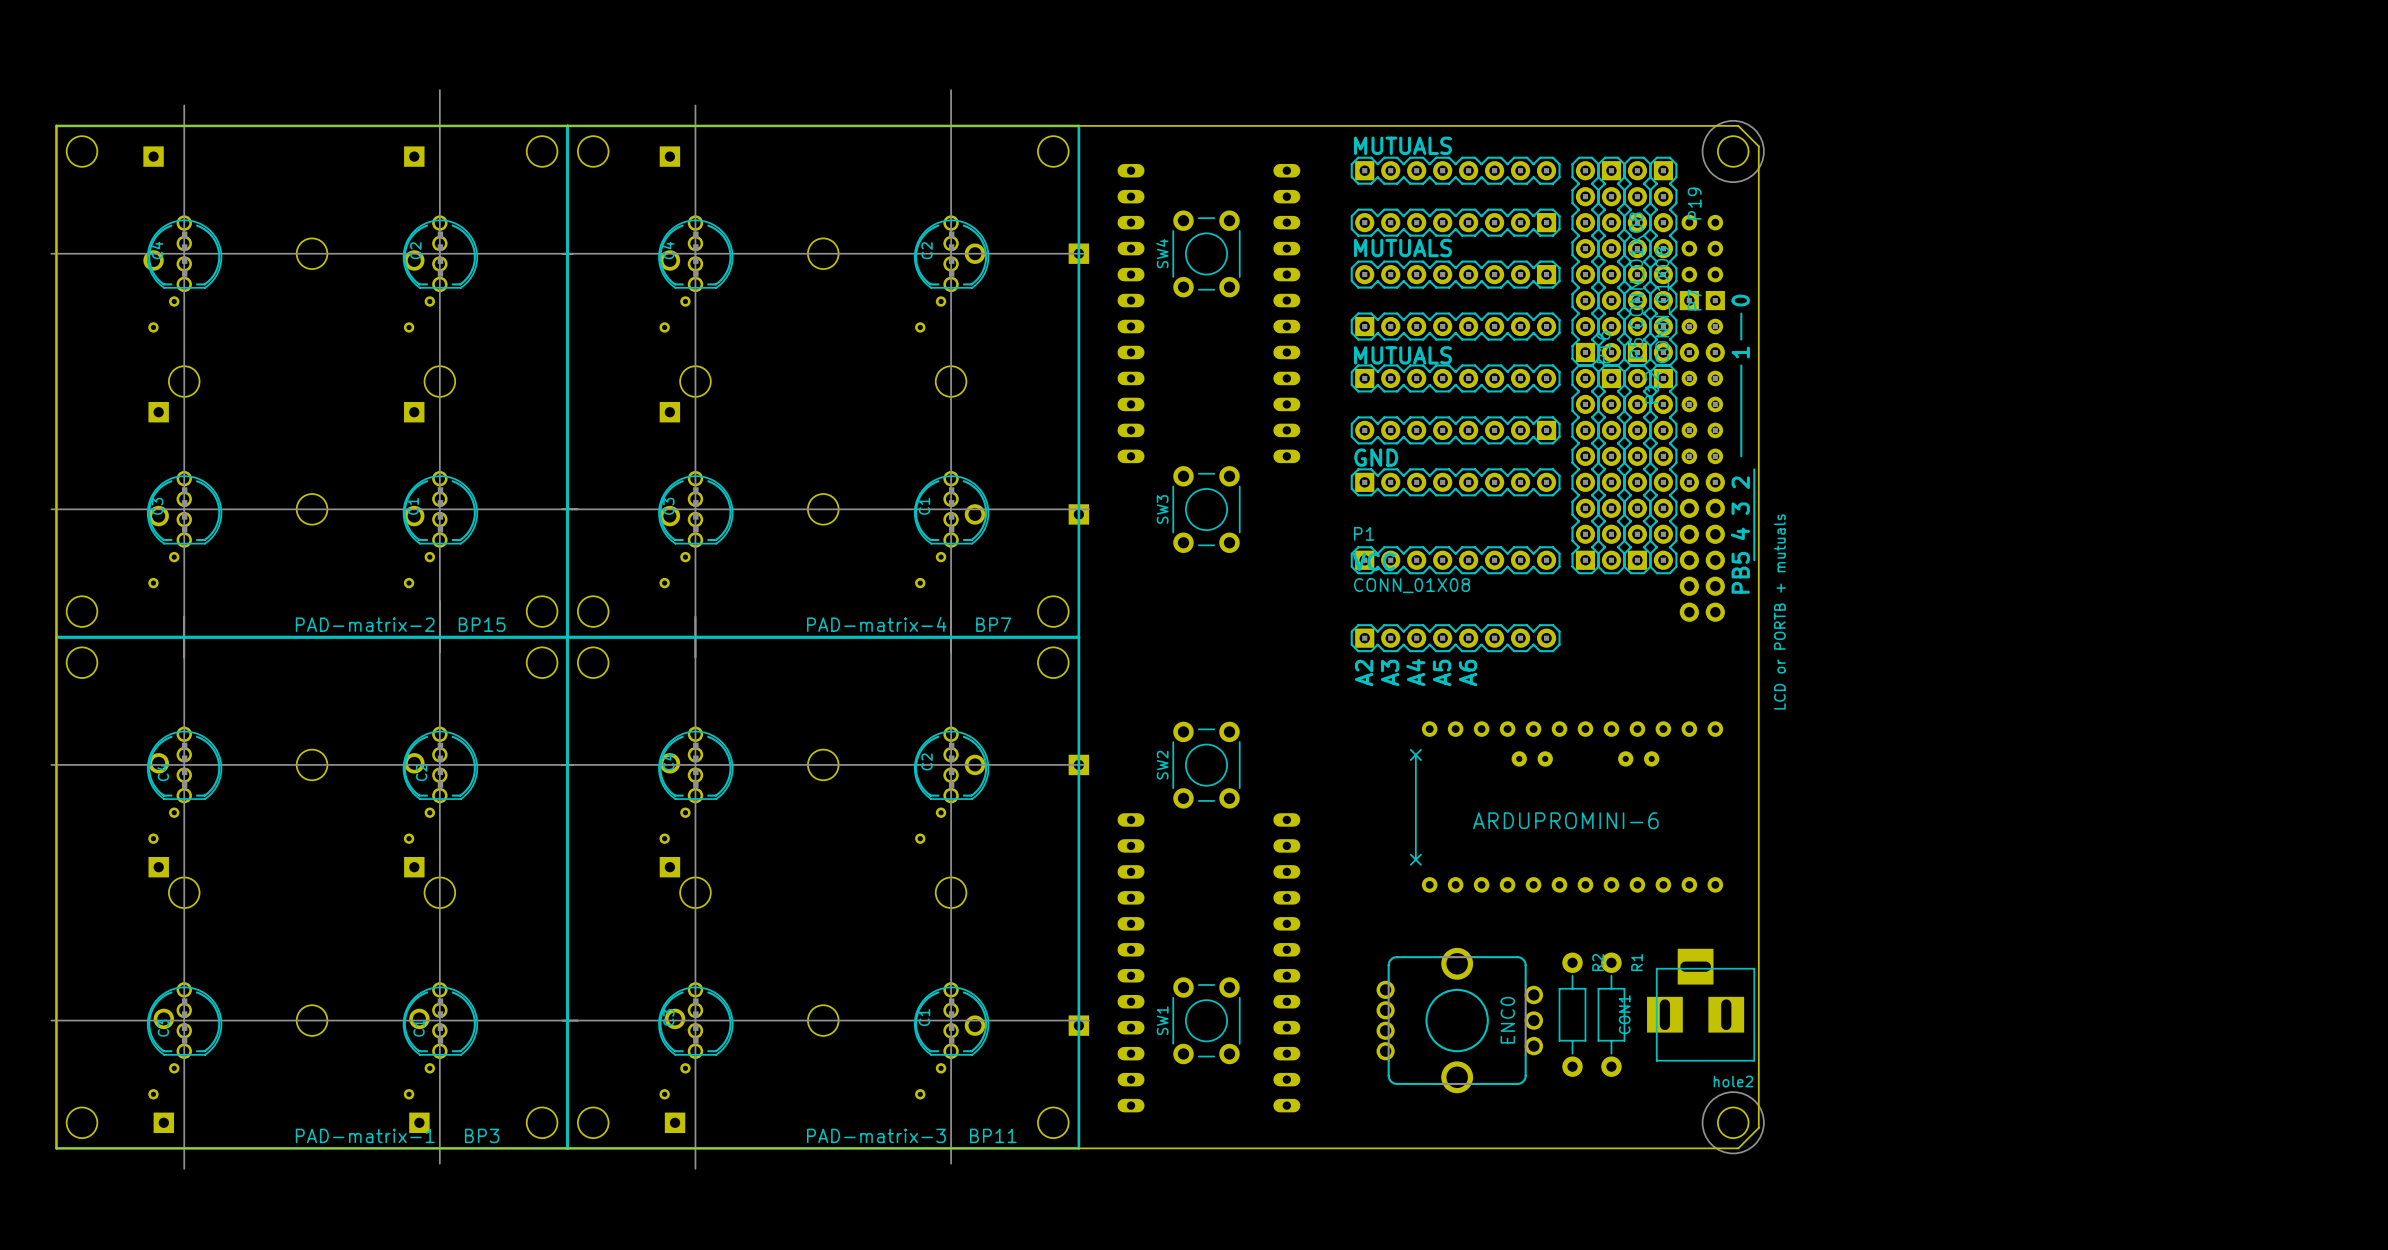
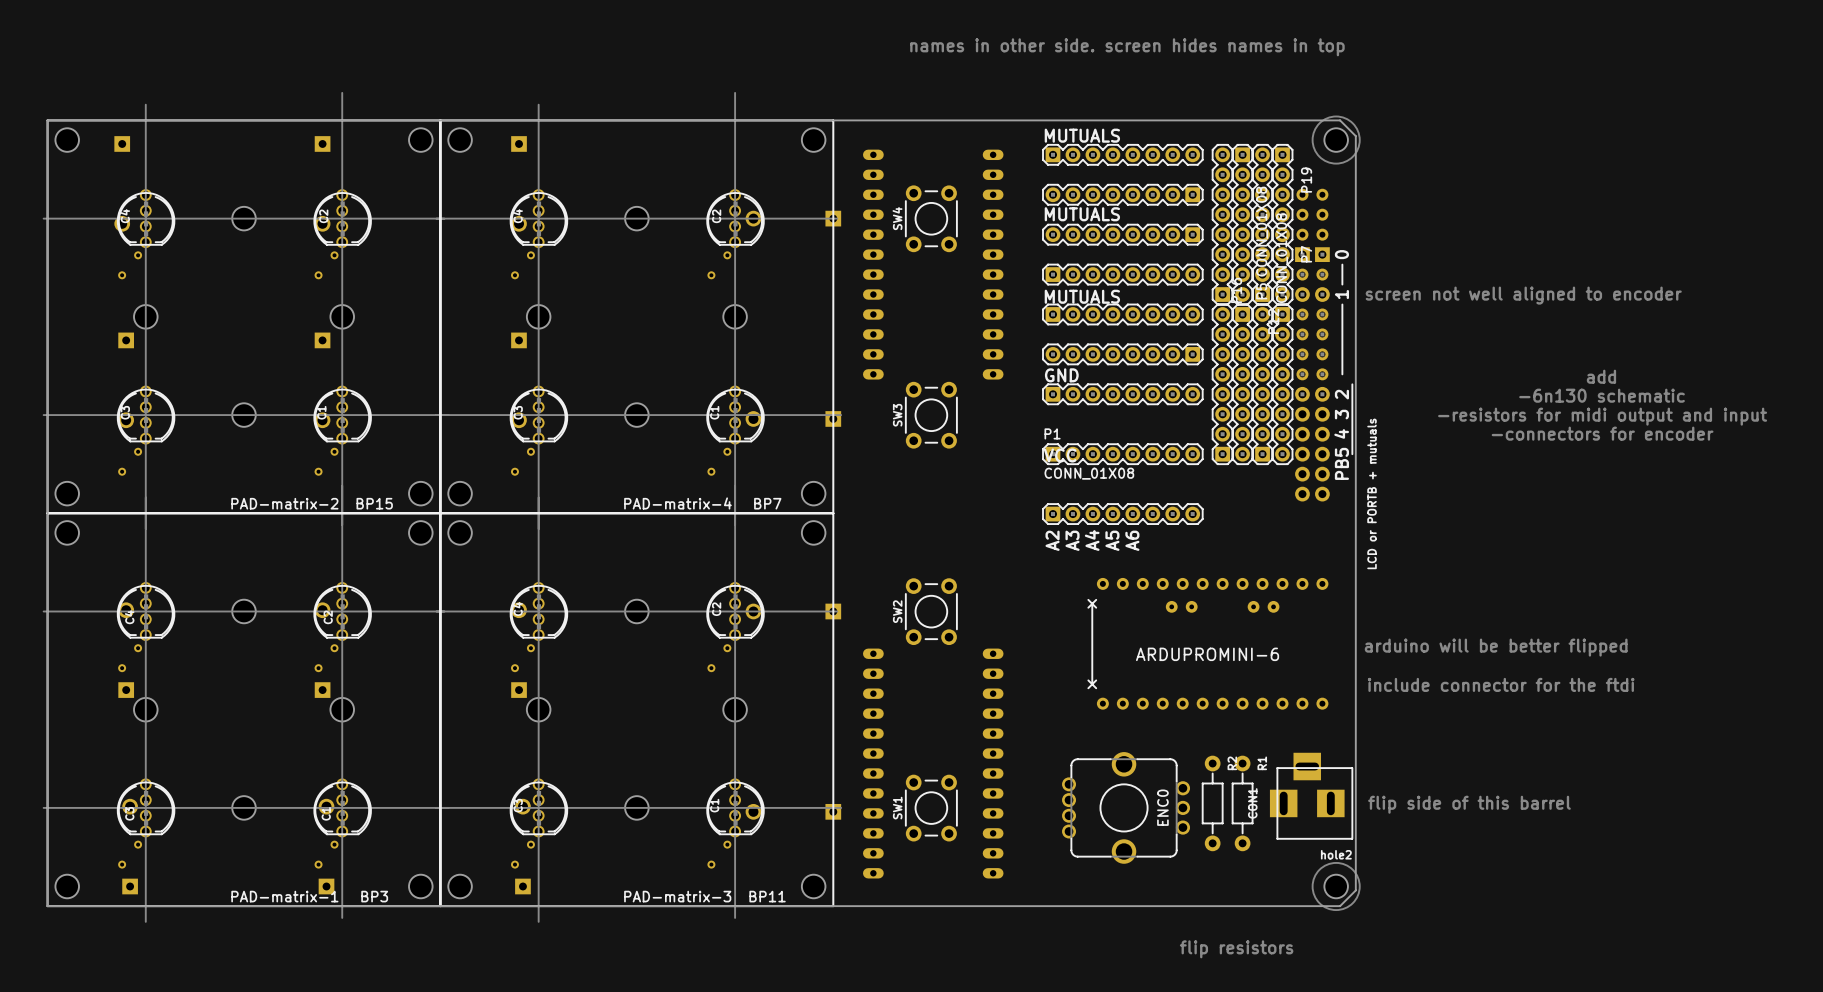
text: none -> names in other side. screen hides names in top (1127, 47)
text: none -> screen not well aligned to encoder (1523, 295)
text: none -> add (1601, 376)
text: none -> -6n130 schematic (1602, 395)
text: none -> -resistors for midi output and input (1602, 416)
text: none -> -connectors for encoder (1602, 433)
text: none -> arduino will be better flipped (1496, 647)
text: none -> include connector for the ftdi (1501, 684)
text: none -> flip side of this barrel (1469, 804)
text: none -> flip resistors (1236, 949)

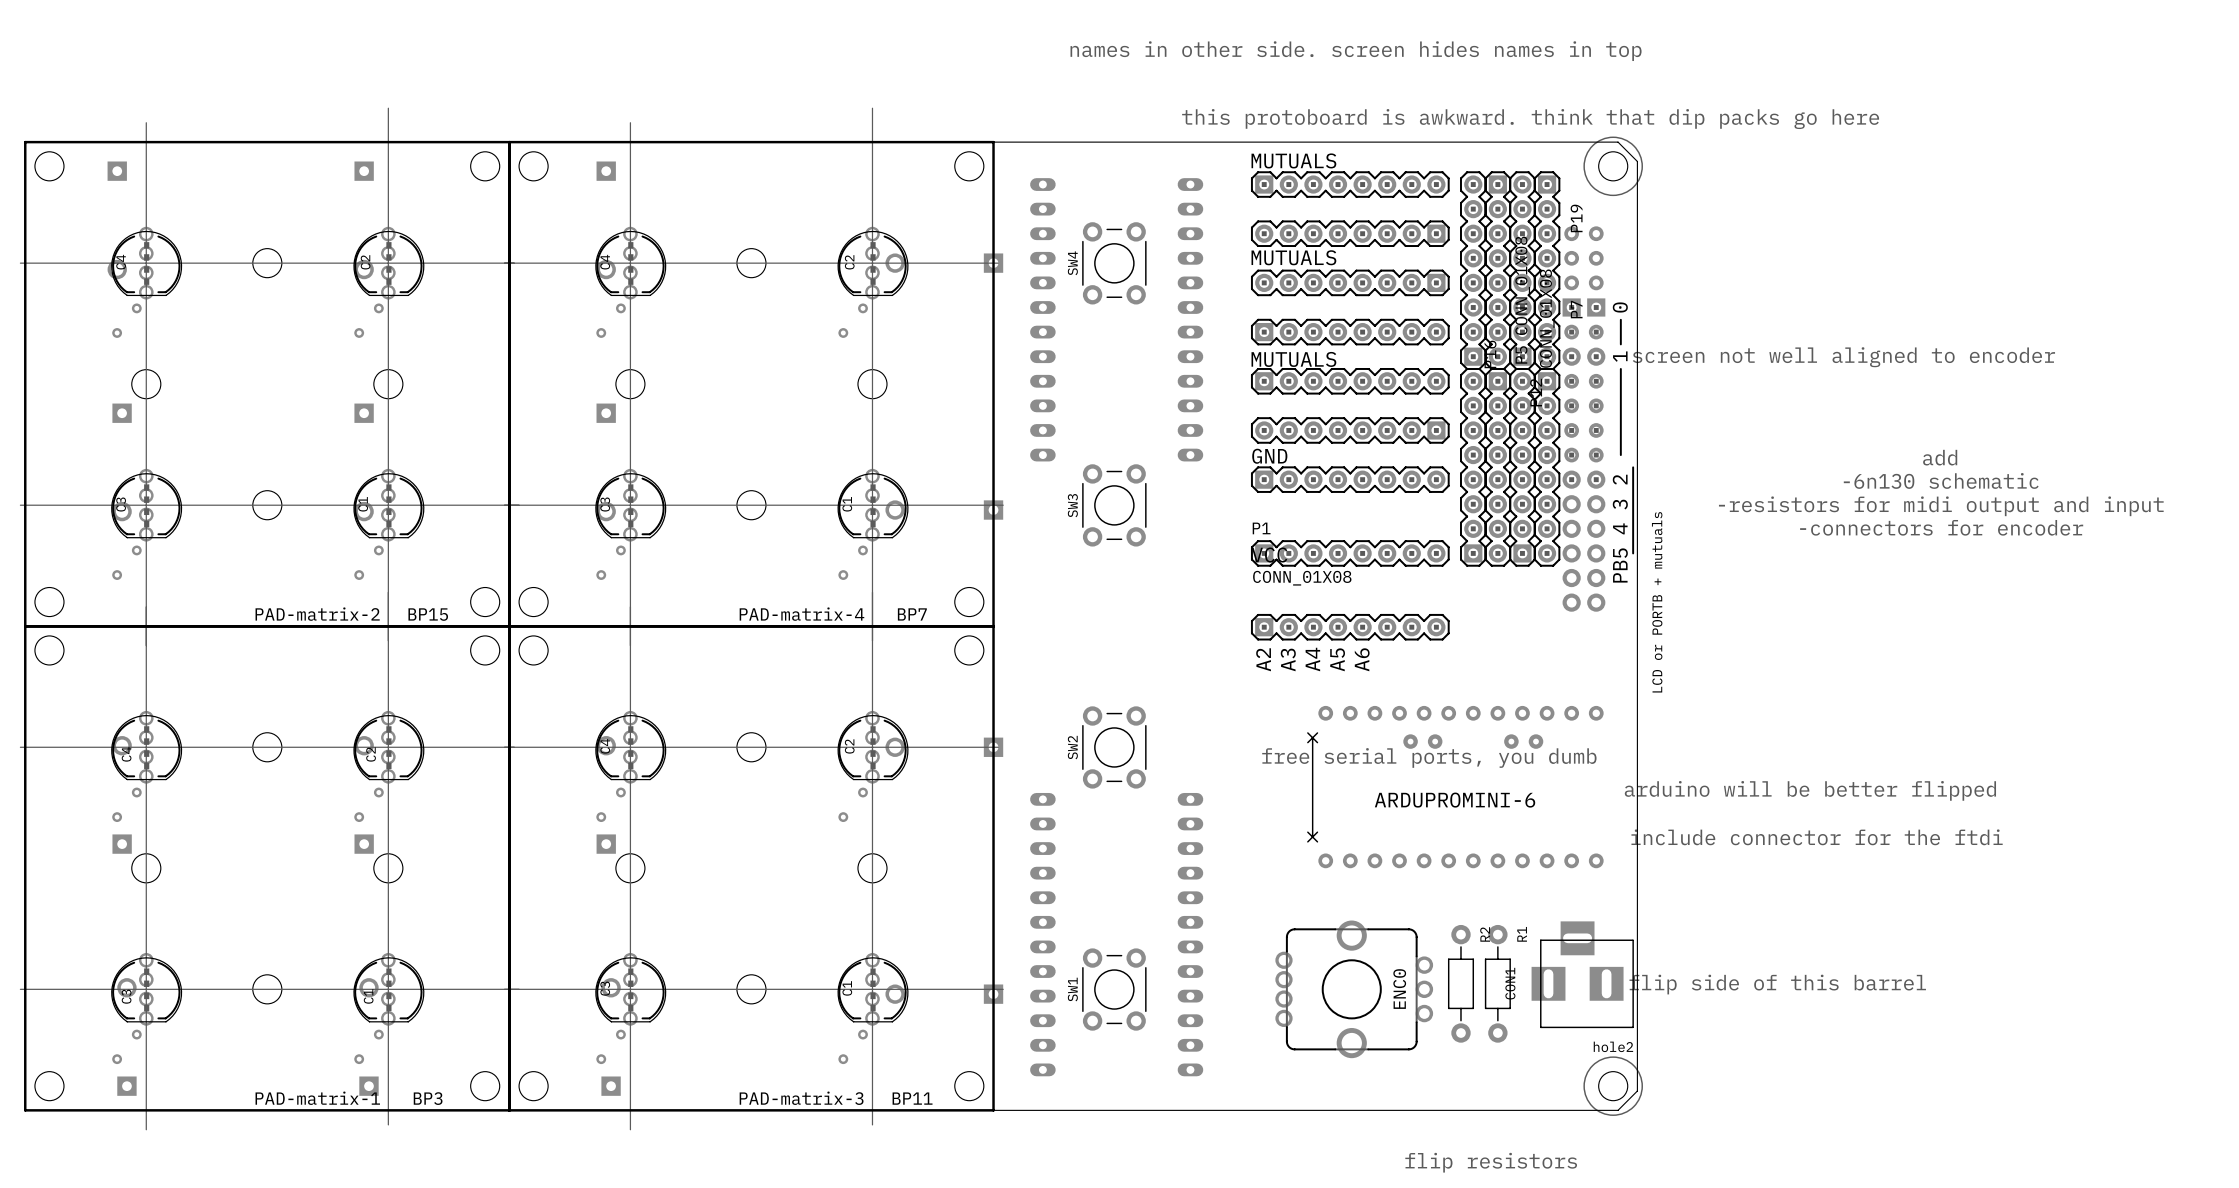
text: none -> this protoboard is awkward. think that dip packs go here (1530, 119)
text: none -> free serial ports, you dumb (1429, 757)

